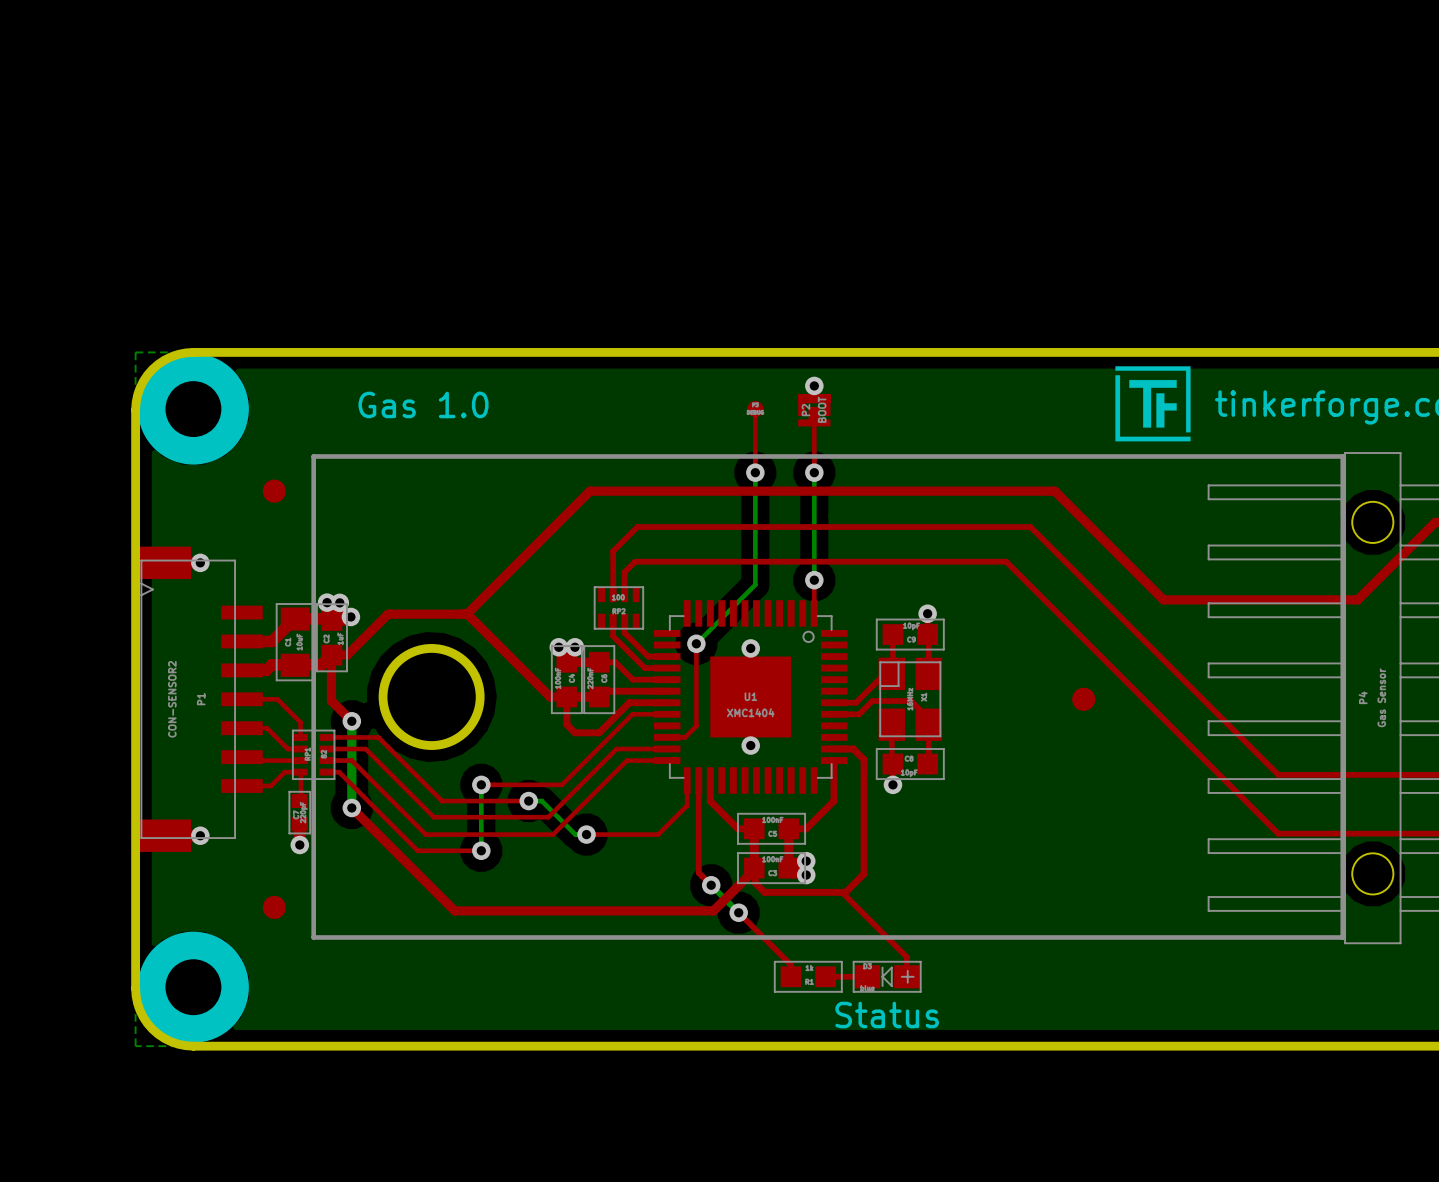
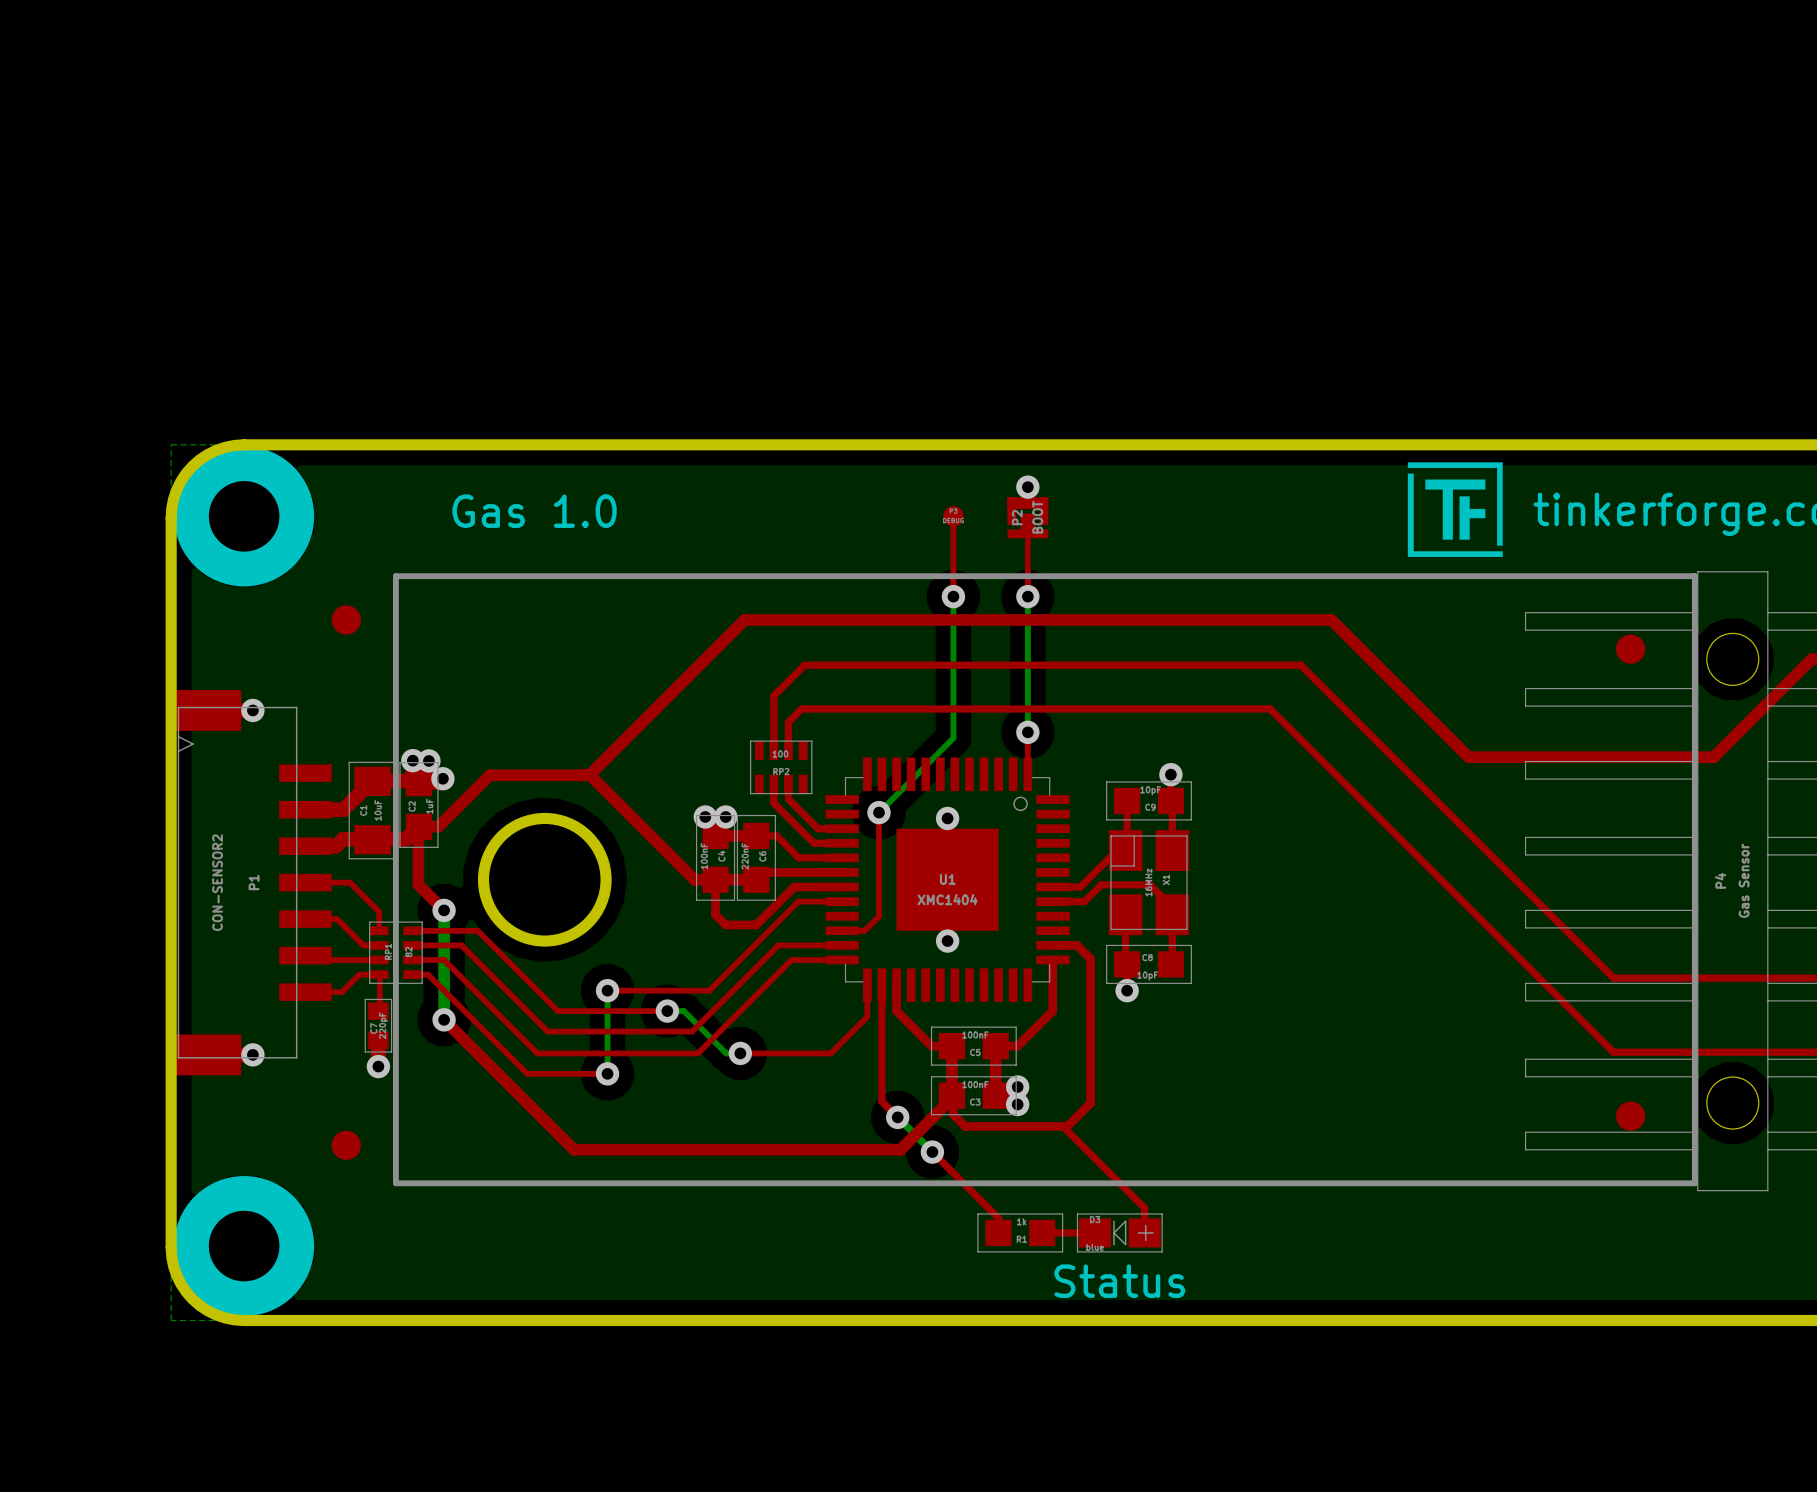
part: none -> (1630, 649)
part: (1083, 699) -> none
part: none -> (1630, 1116)

